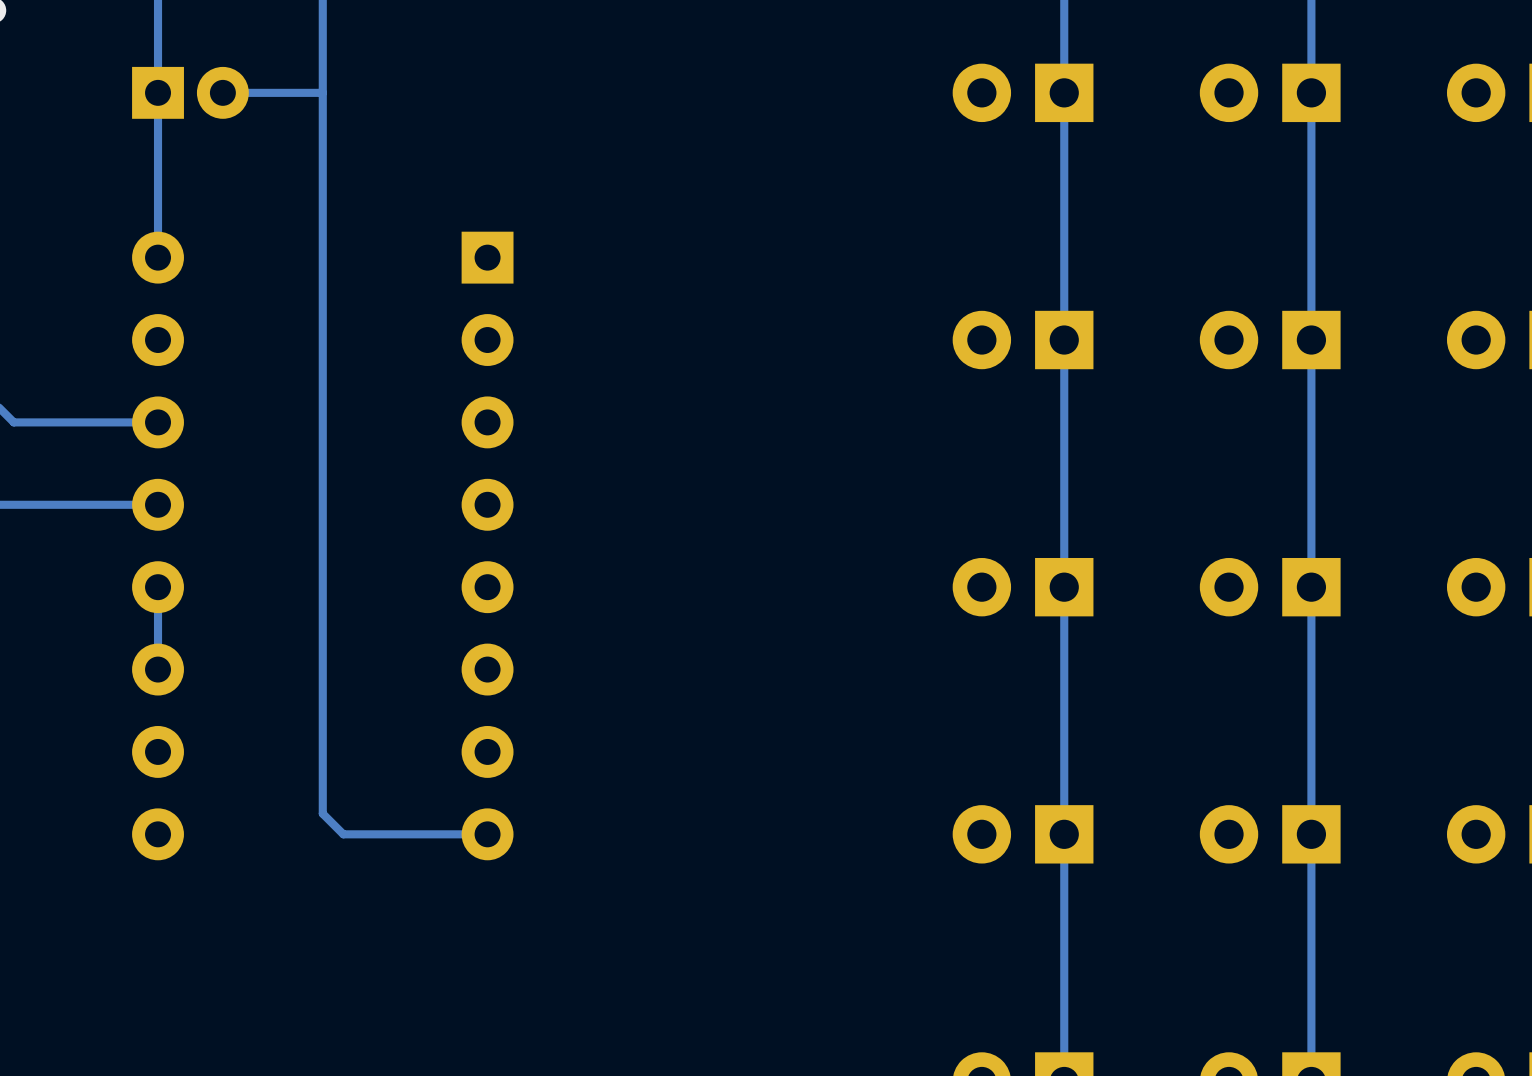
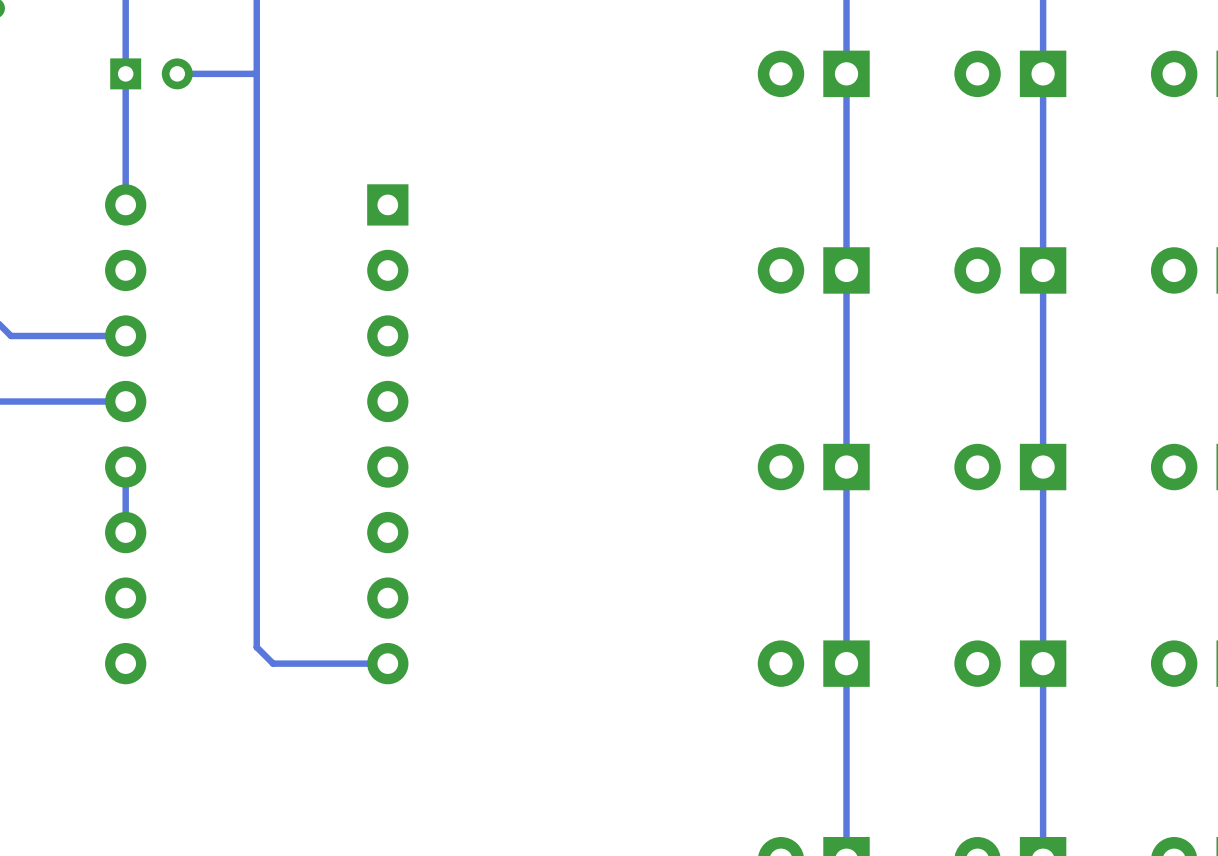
part footprint: [132, 66, 249, 119] -> [110, 58, 193, 90]

